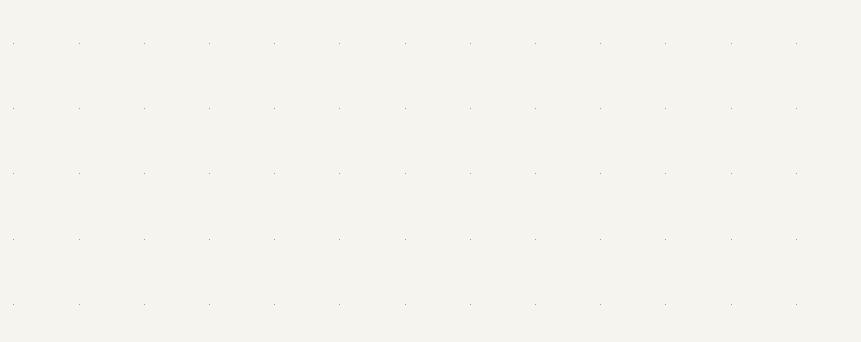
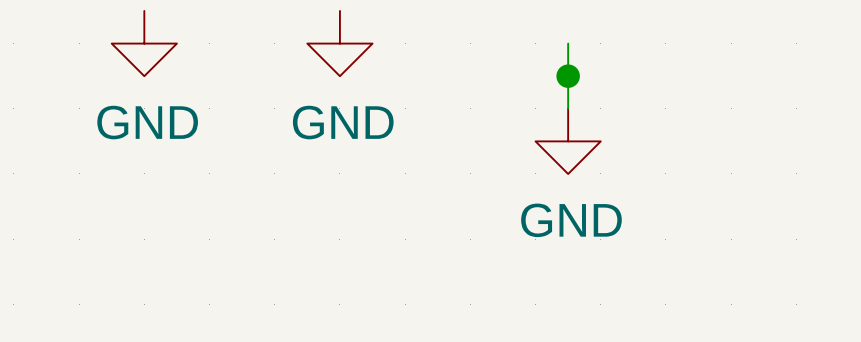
power symbol: none -> GND (144, 43)
power symbol: none -> GND (339, 43)
wire: none -> (568, 43) (568, 108)
junction: none -> (568, 76)
power symbol: none -> GND (568, 141)

